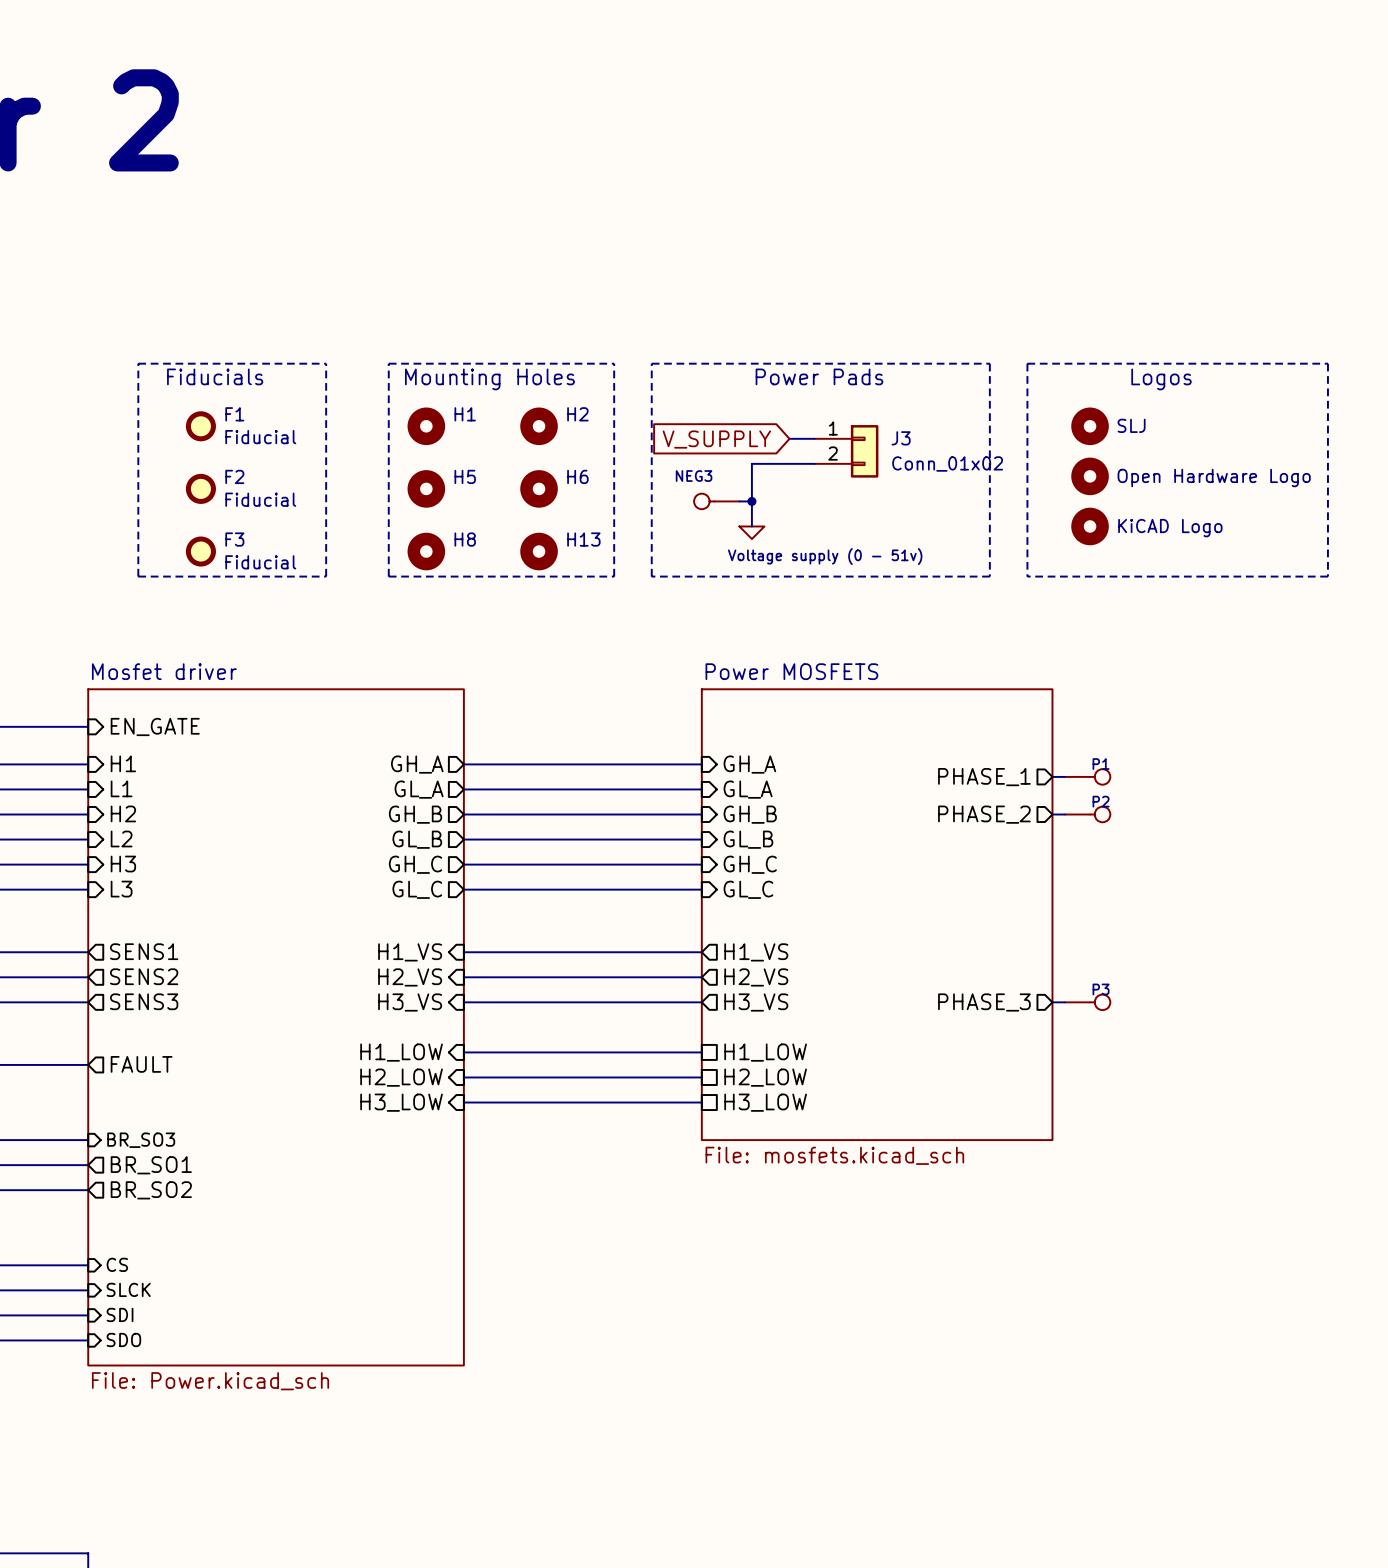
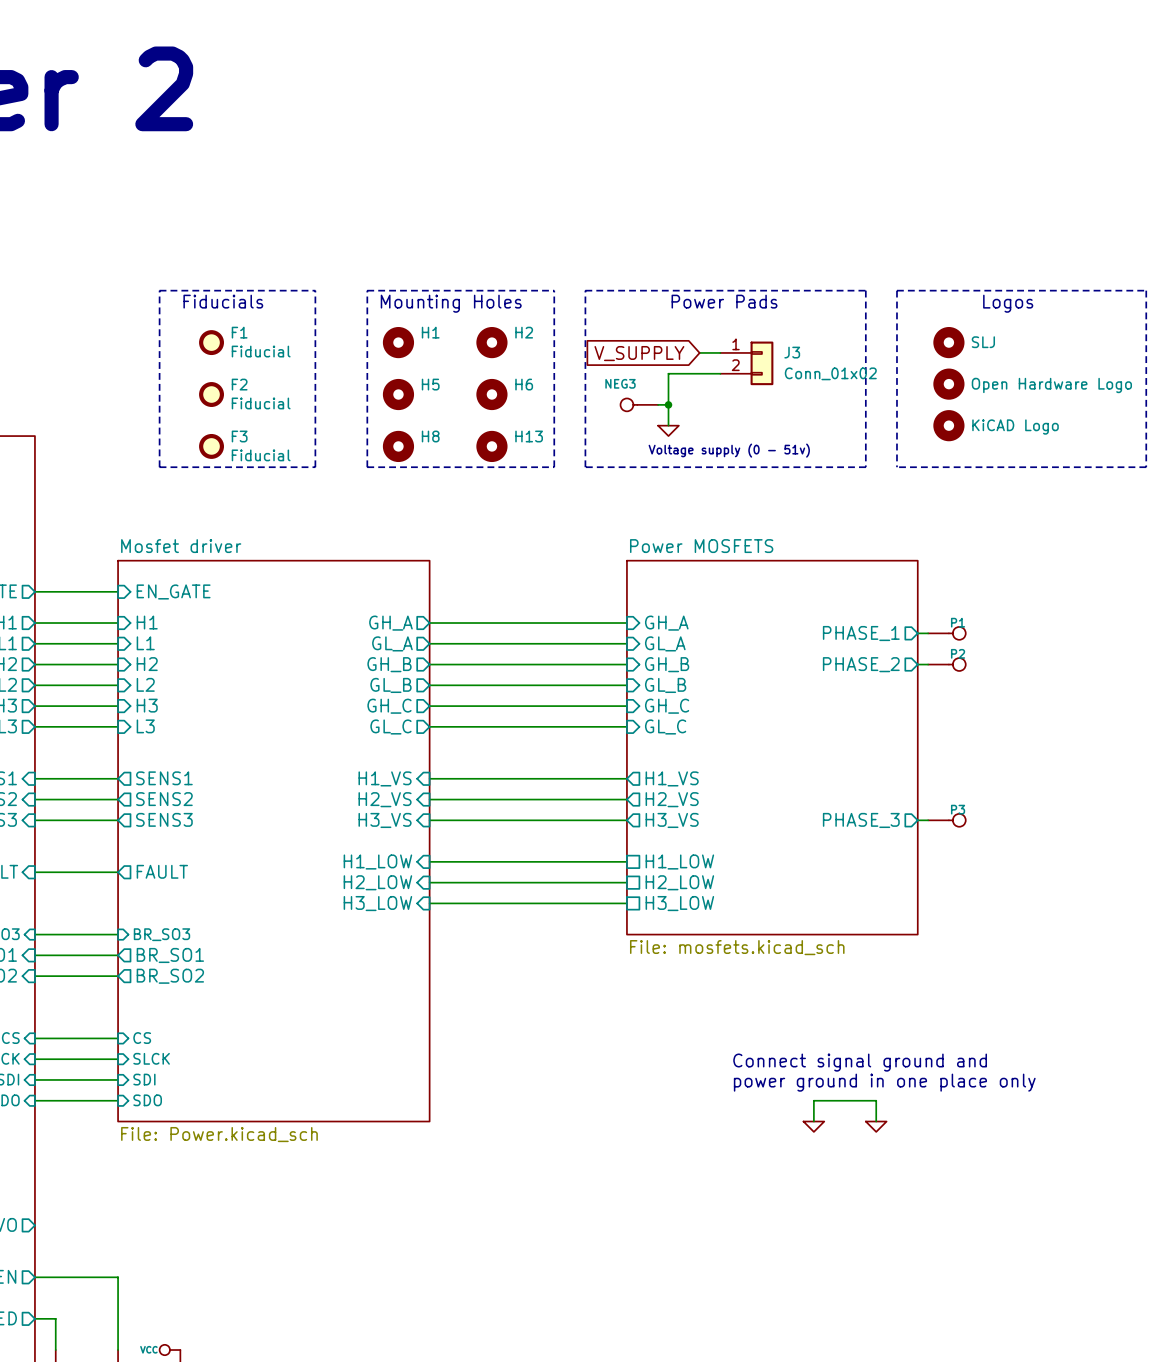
text: none -> Connect signal ground and (860, 1062)
text: none -> power ground in one place only (884, 1082)
wire: none -> (813, 1121) (813, 1100) (876, 1100) (876, 1121)
power symbol: none -> (813, 1126)
power symbol: none -> (876, 1126)

